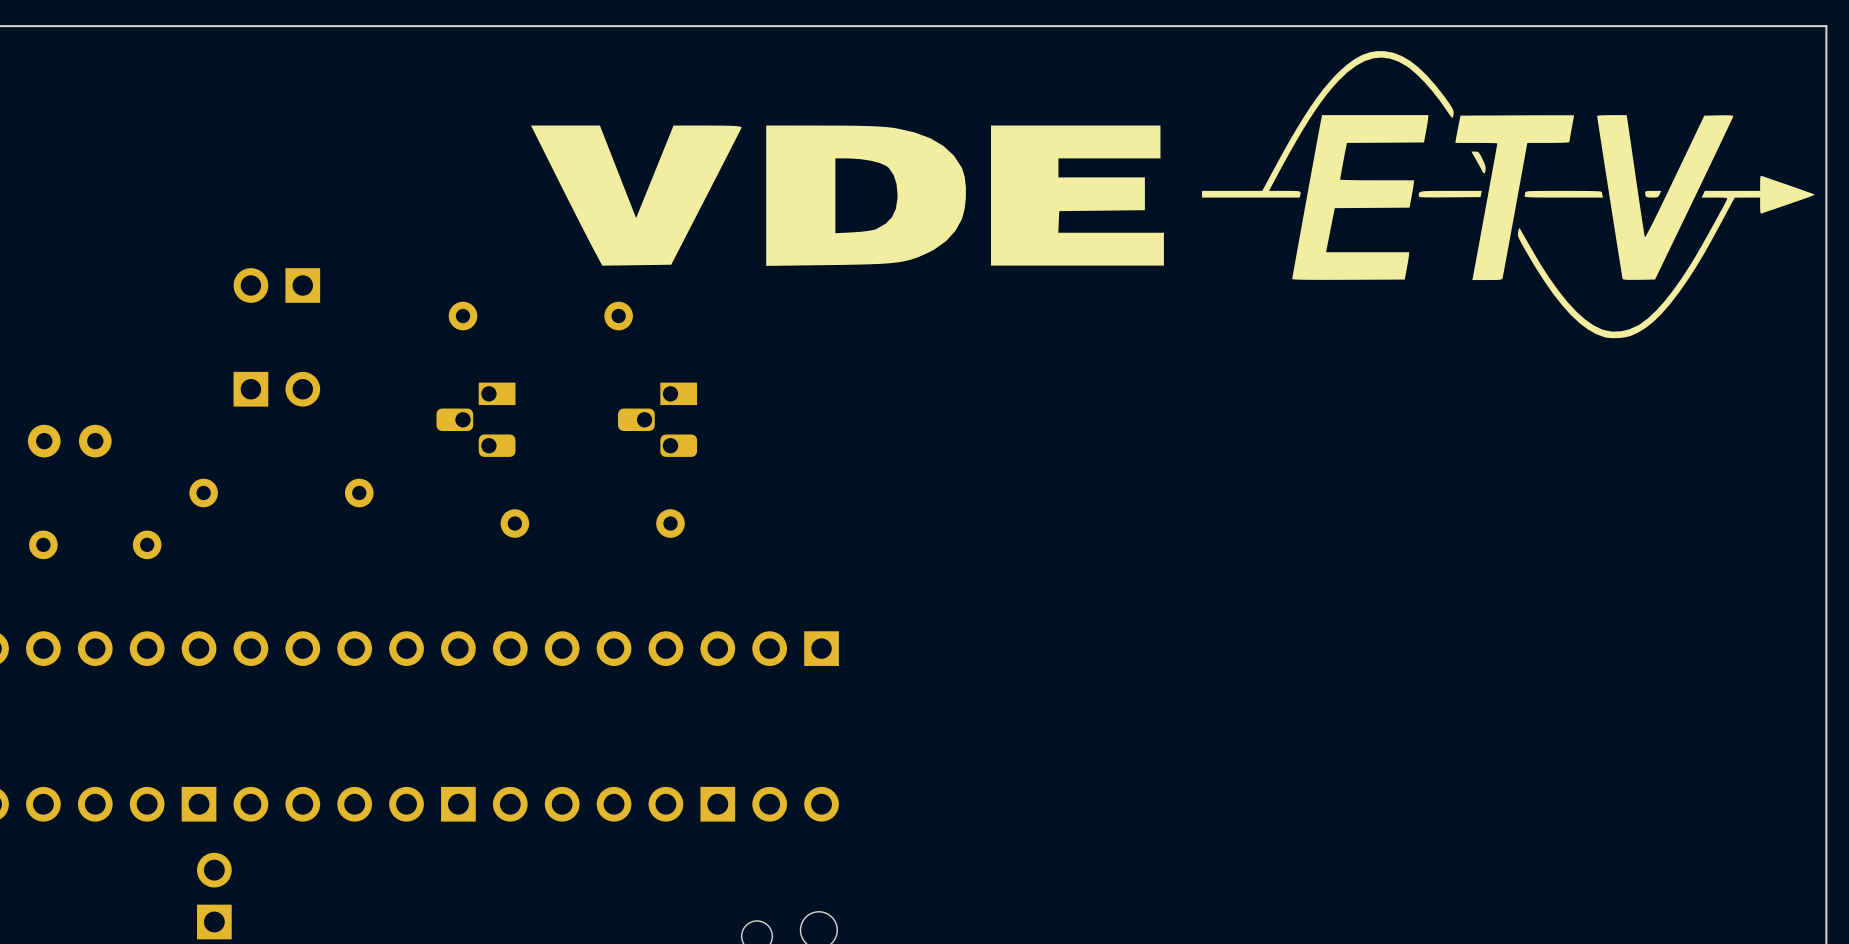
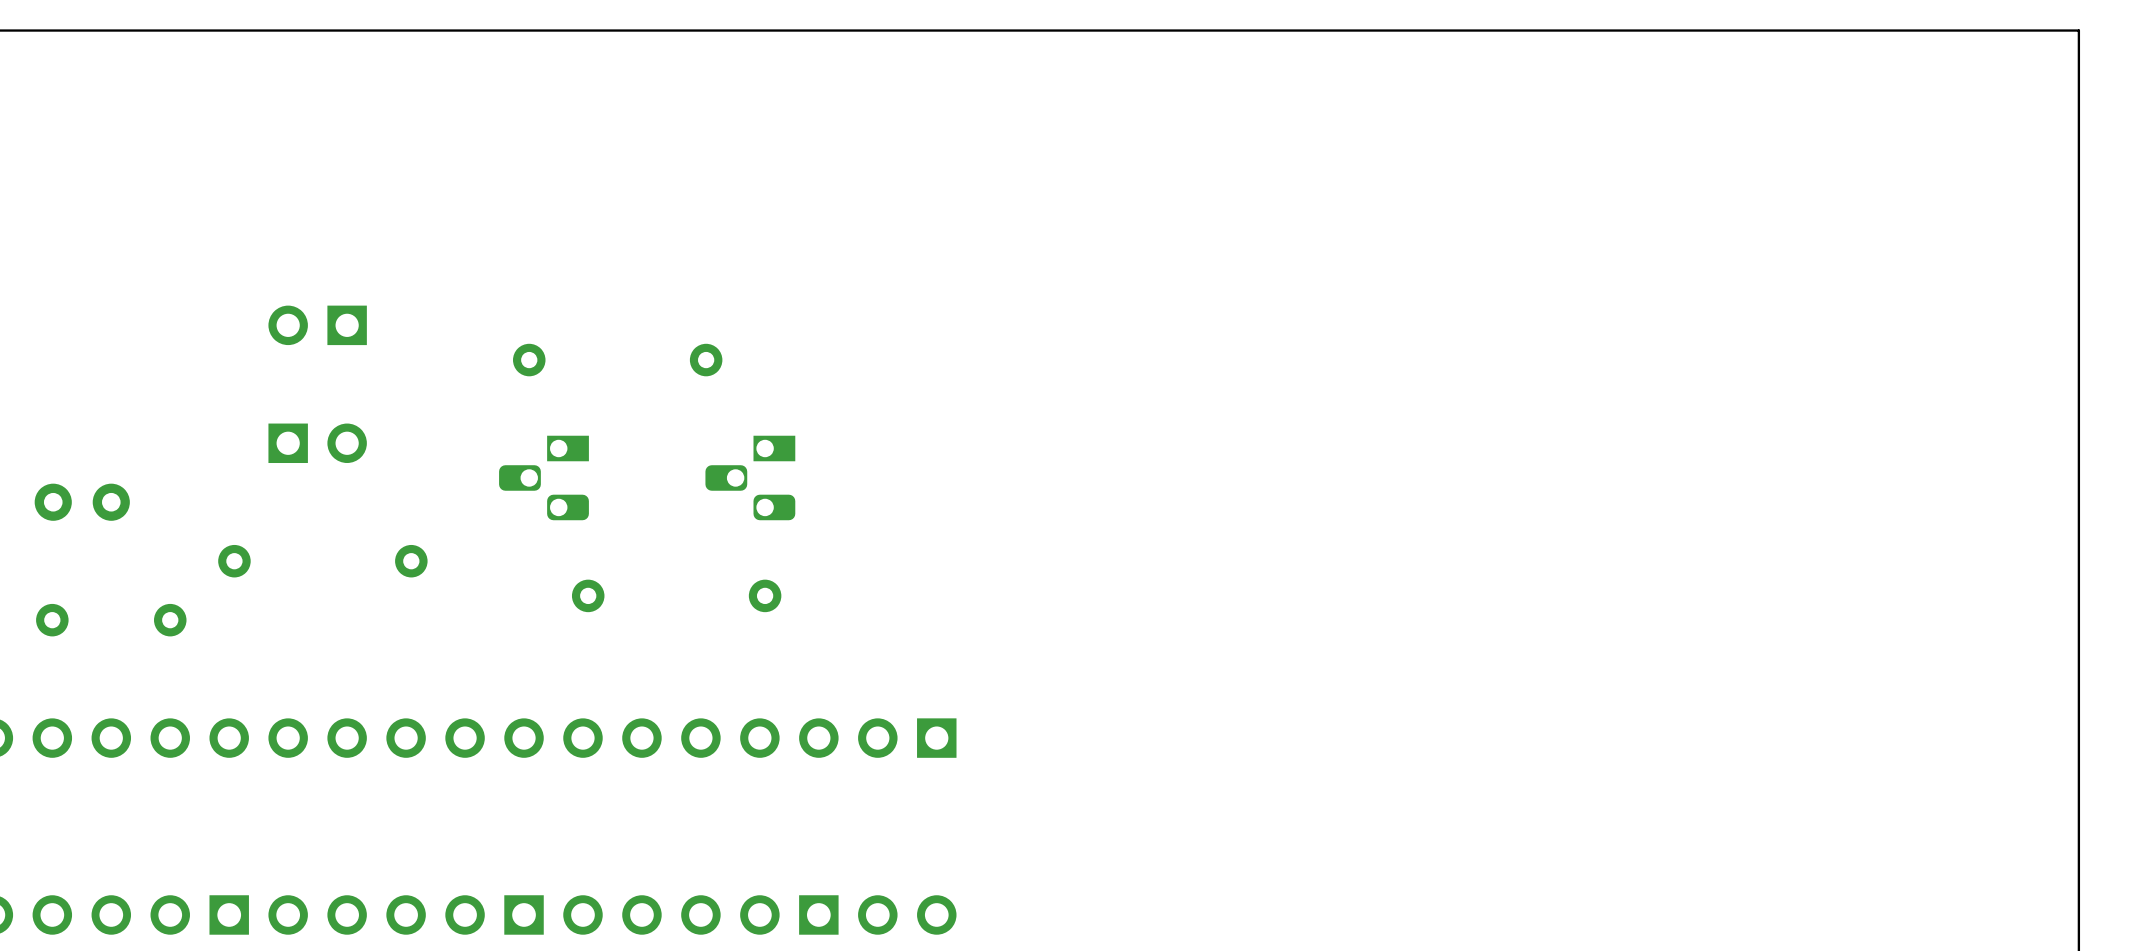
drawing: [1202, 51, 1815, 339] -> none
drawing: [531, 125, 1164, 266] -> none

